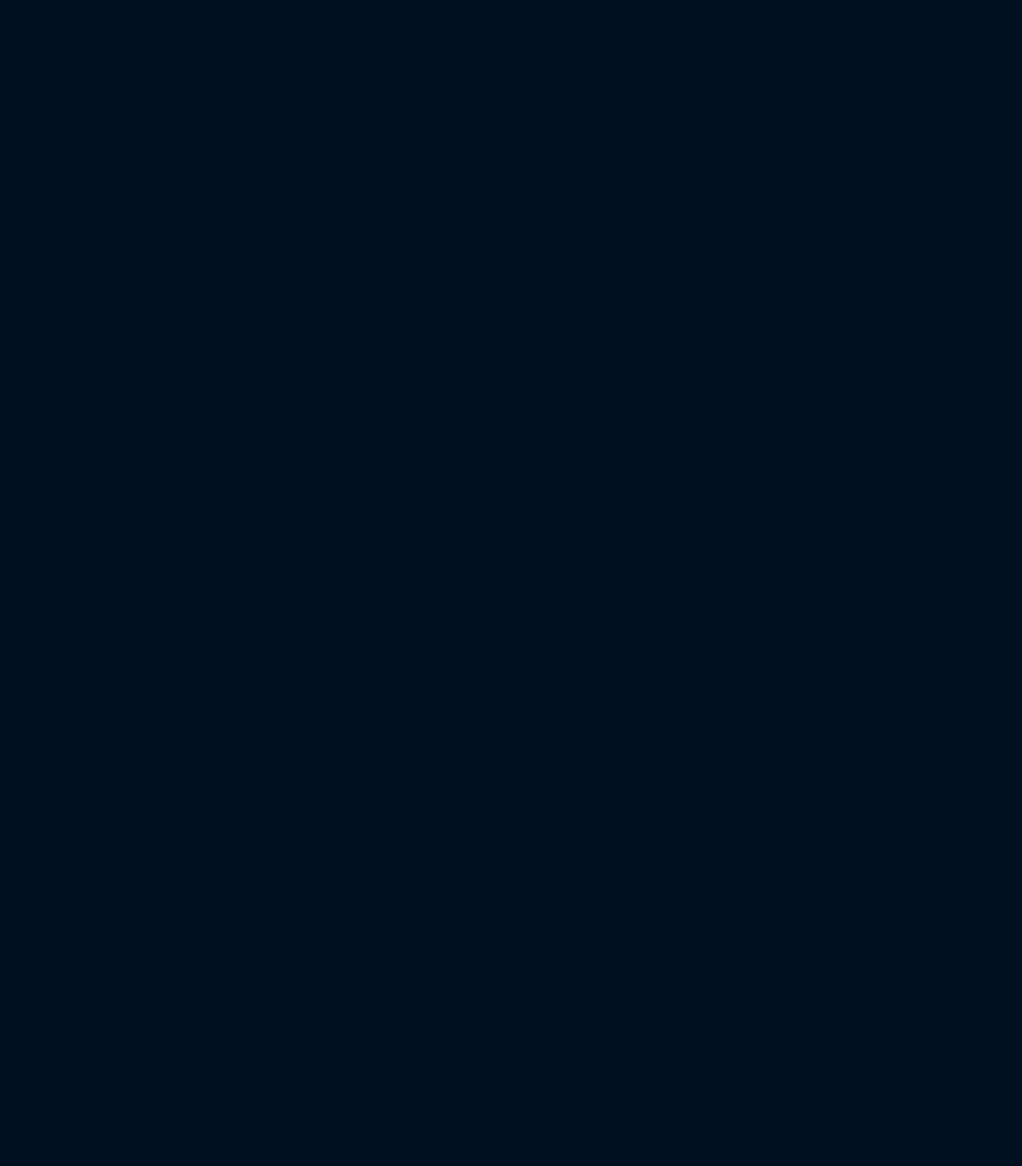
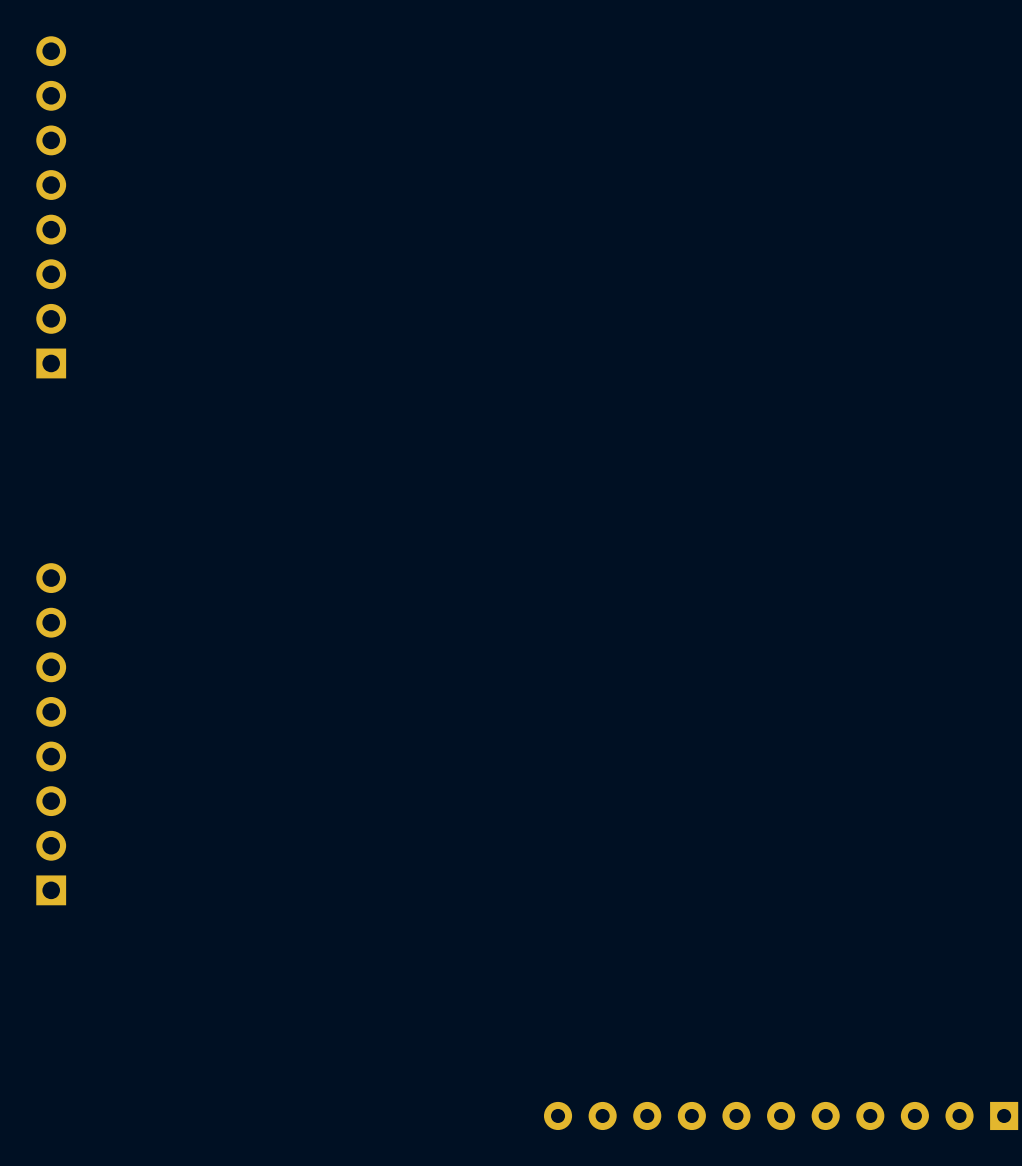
part: none -> (51, 207)
part: none -> (51, 734)
part: none -> (781, 1115)

